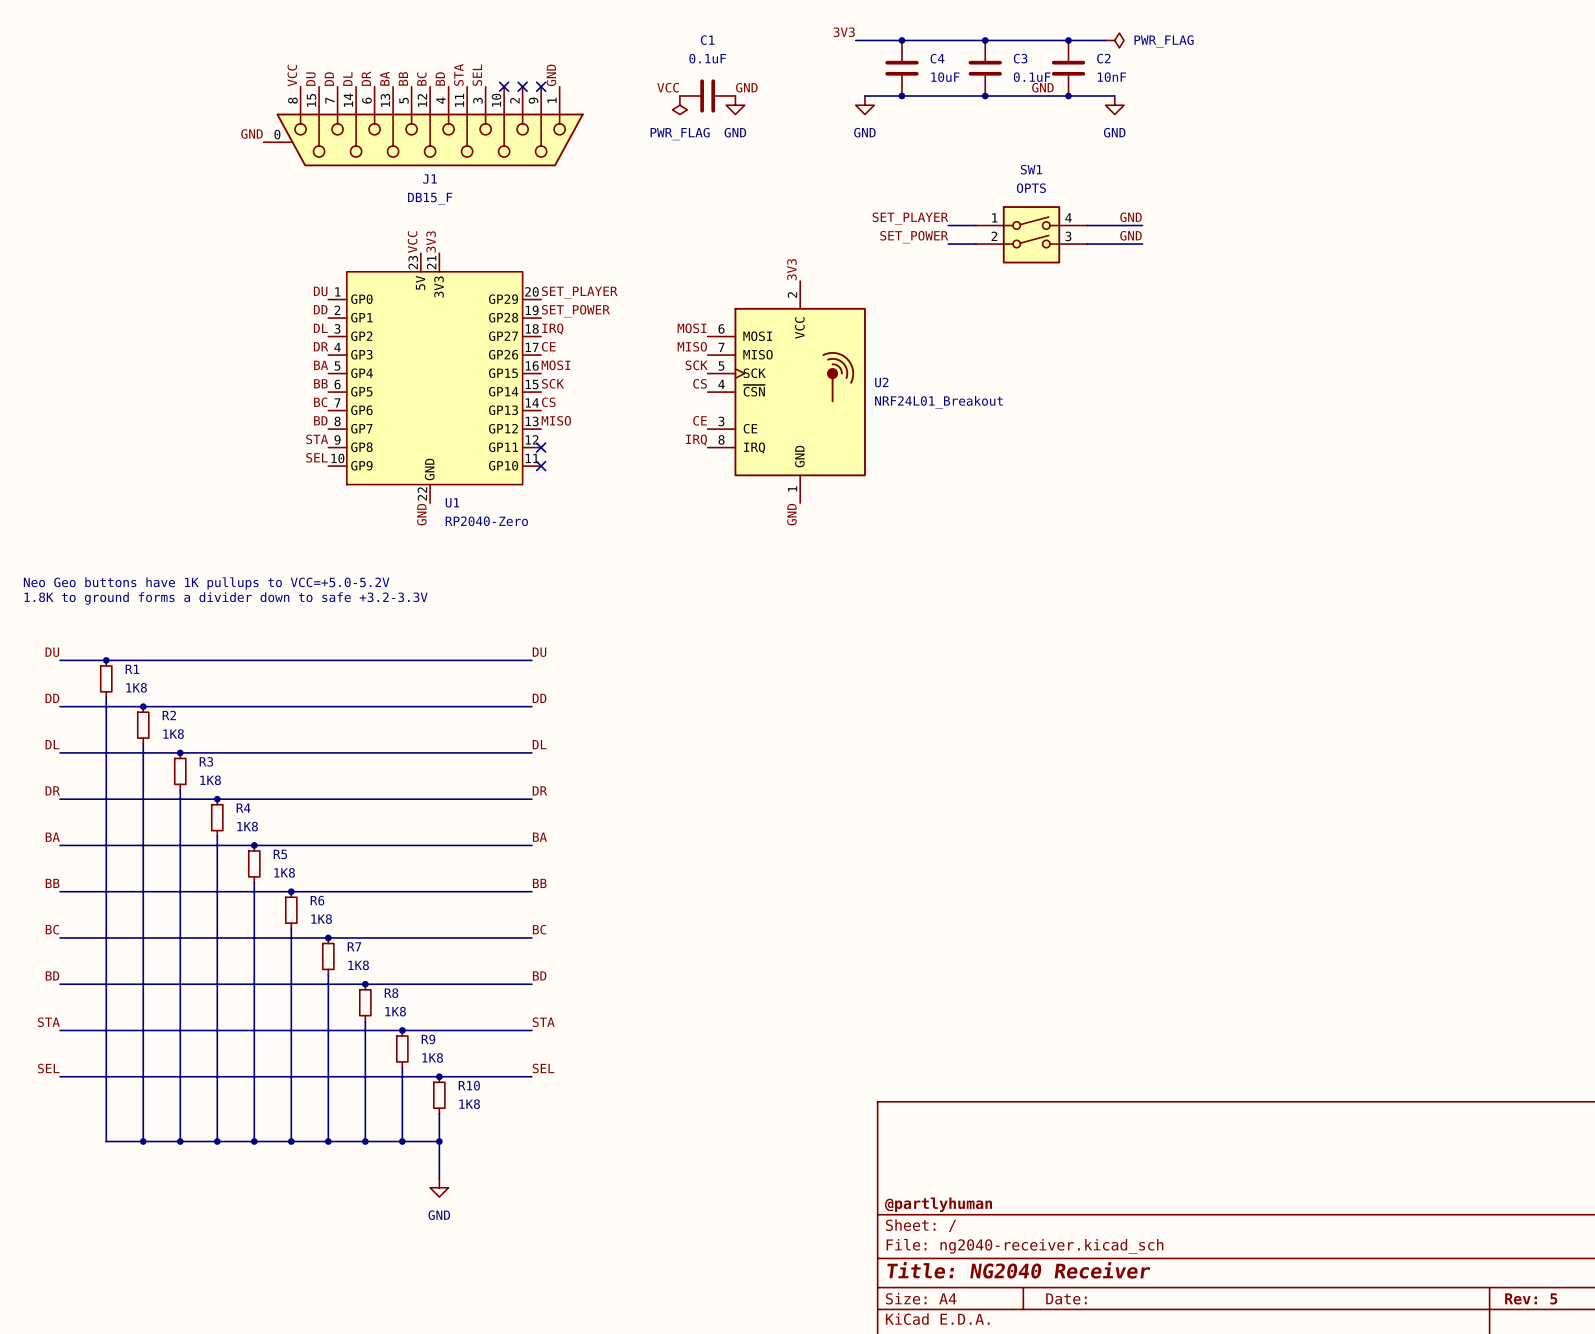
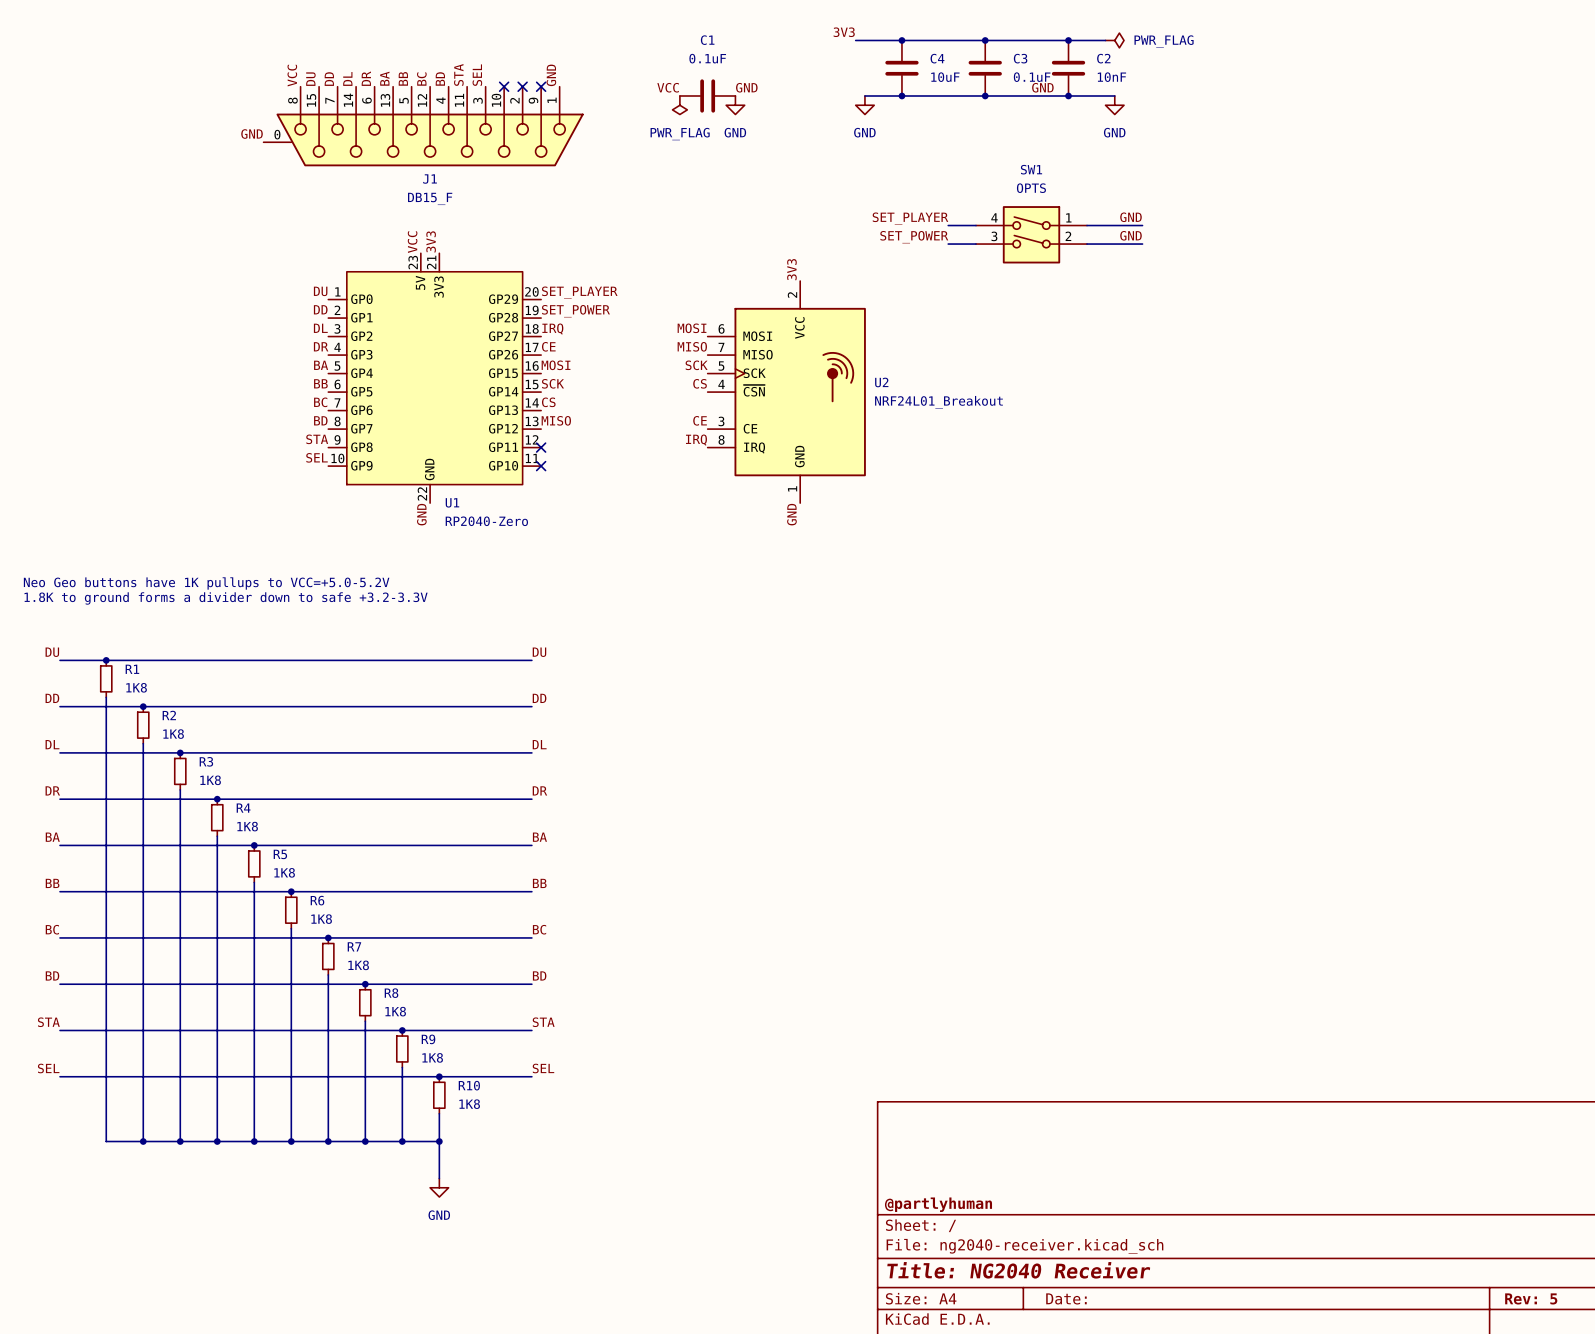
SW1 flip: as is (1031, 234) -> left-right (1031, 234)

